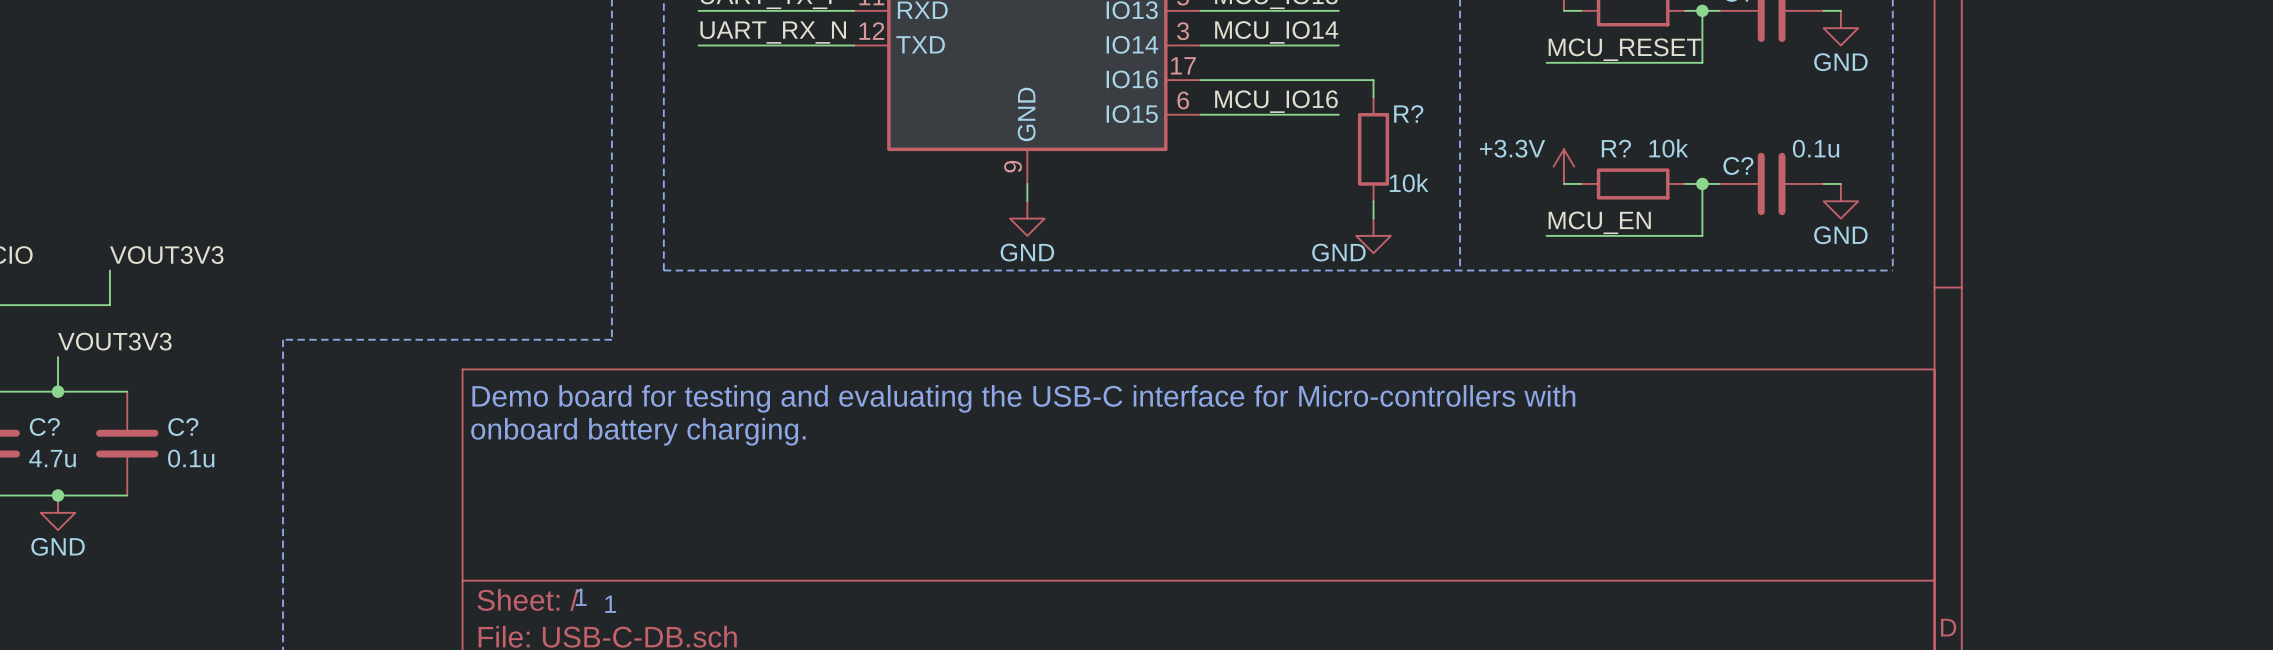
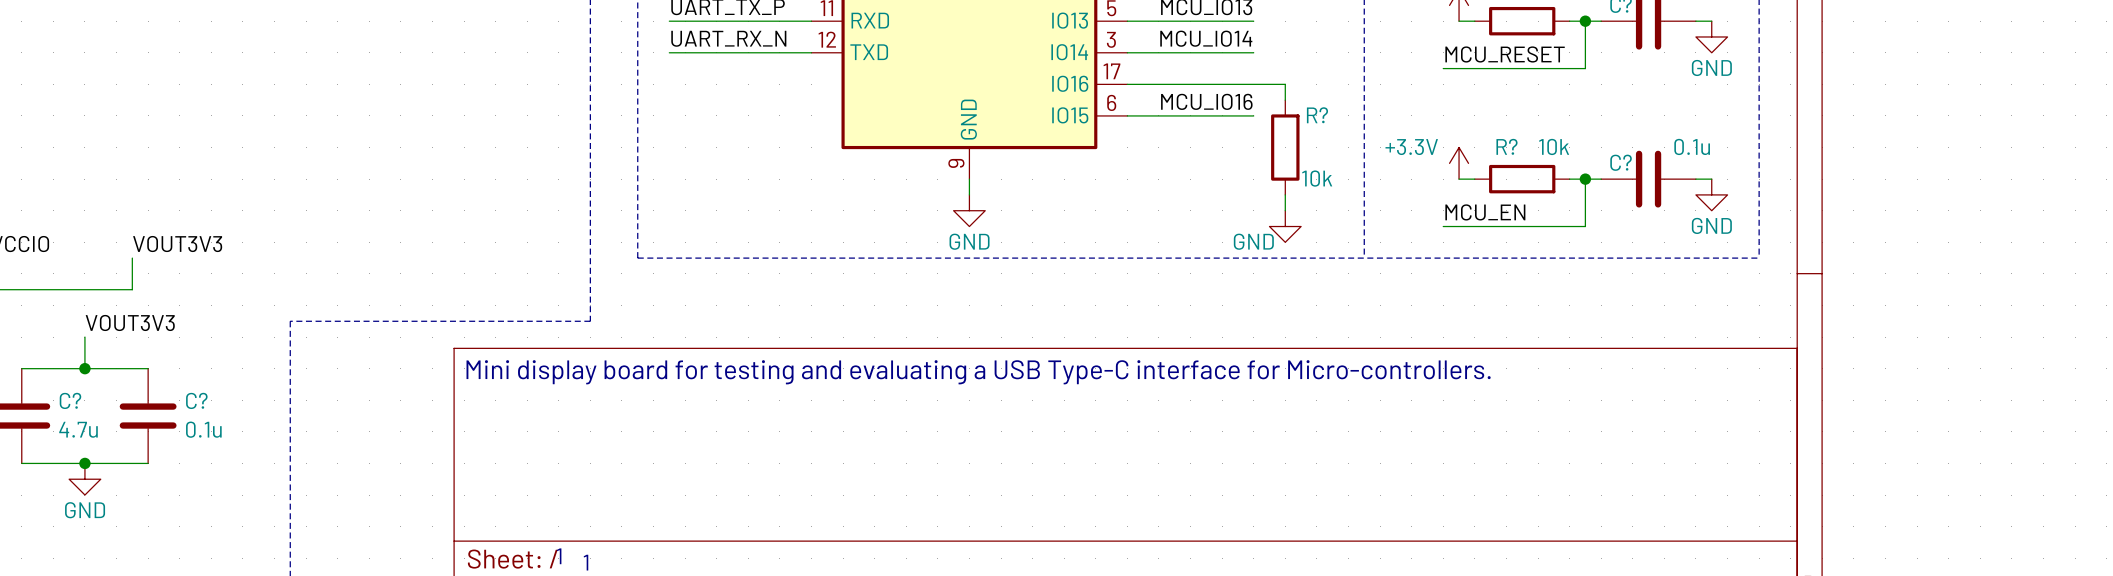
text: Demo board for testing and evaluating the USB-C interface for Micro-controllers with (1023, 398) -> Mini display board for testing and evaluating a USB Type-C interface for Micro-controllers. (978, 372)
text: onboard battery charging. (638, 431) -> none

